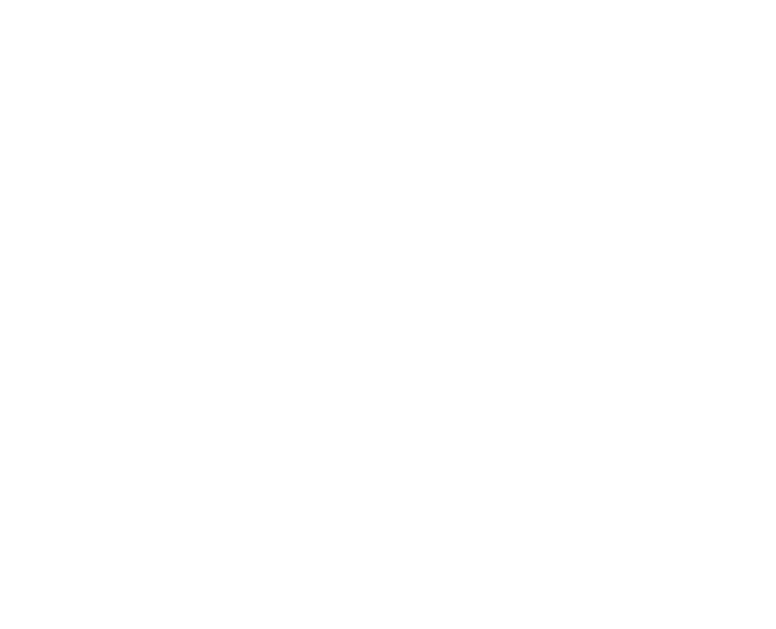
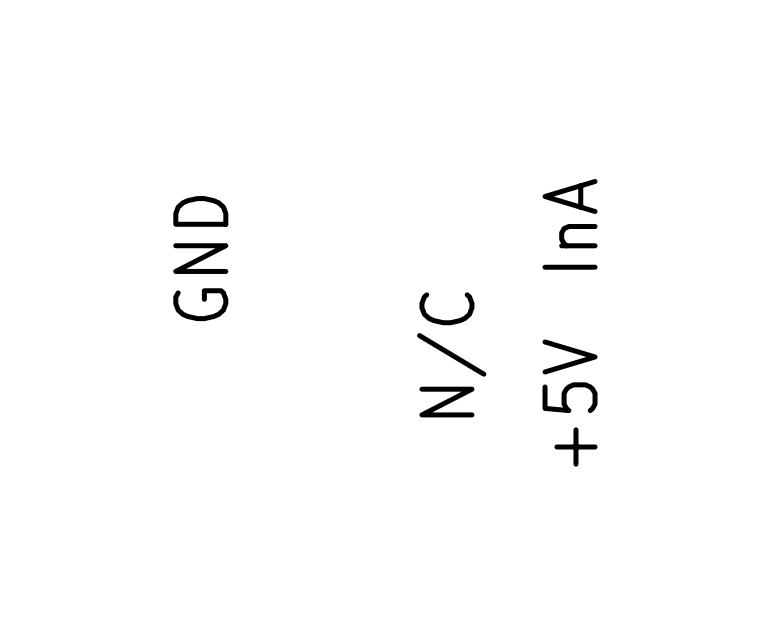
text: none -> InA (570, 224)
text: none -> GND (200, 258)
text: none -> N/C (451, 354)
text: none -> +5V (570, 403)

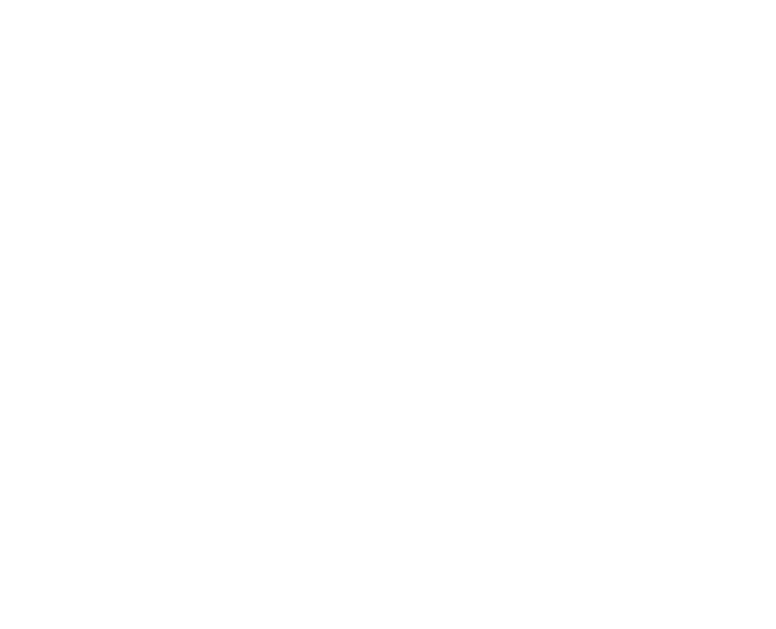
text: InA (570, 224) -> none
text: GND (200, 258) -> none
text: N/C (451, 354) -> none
text: +5V (570, 403) -> none

